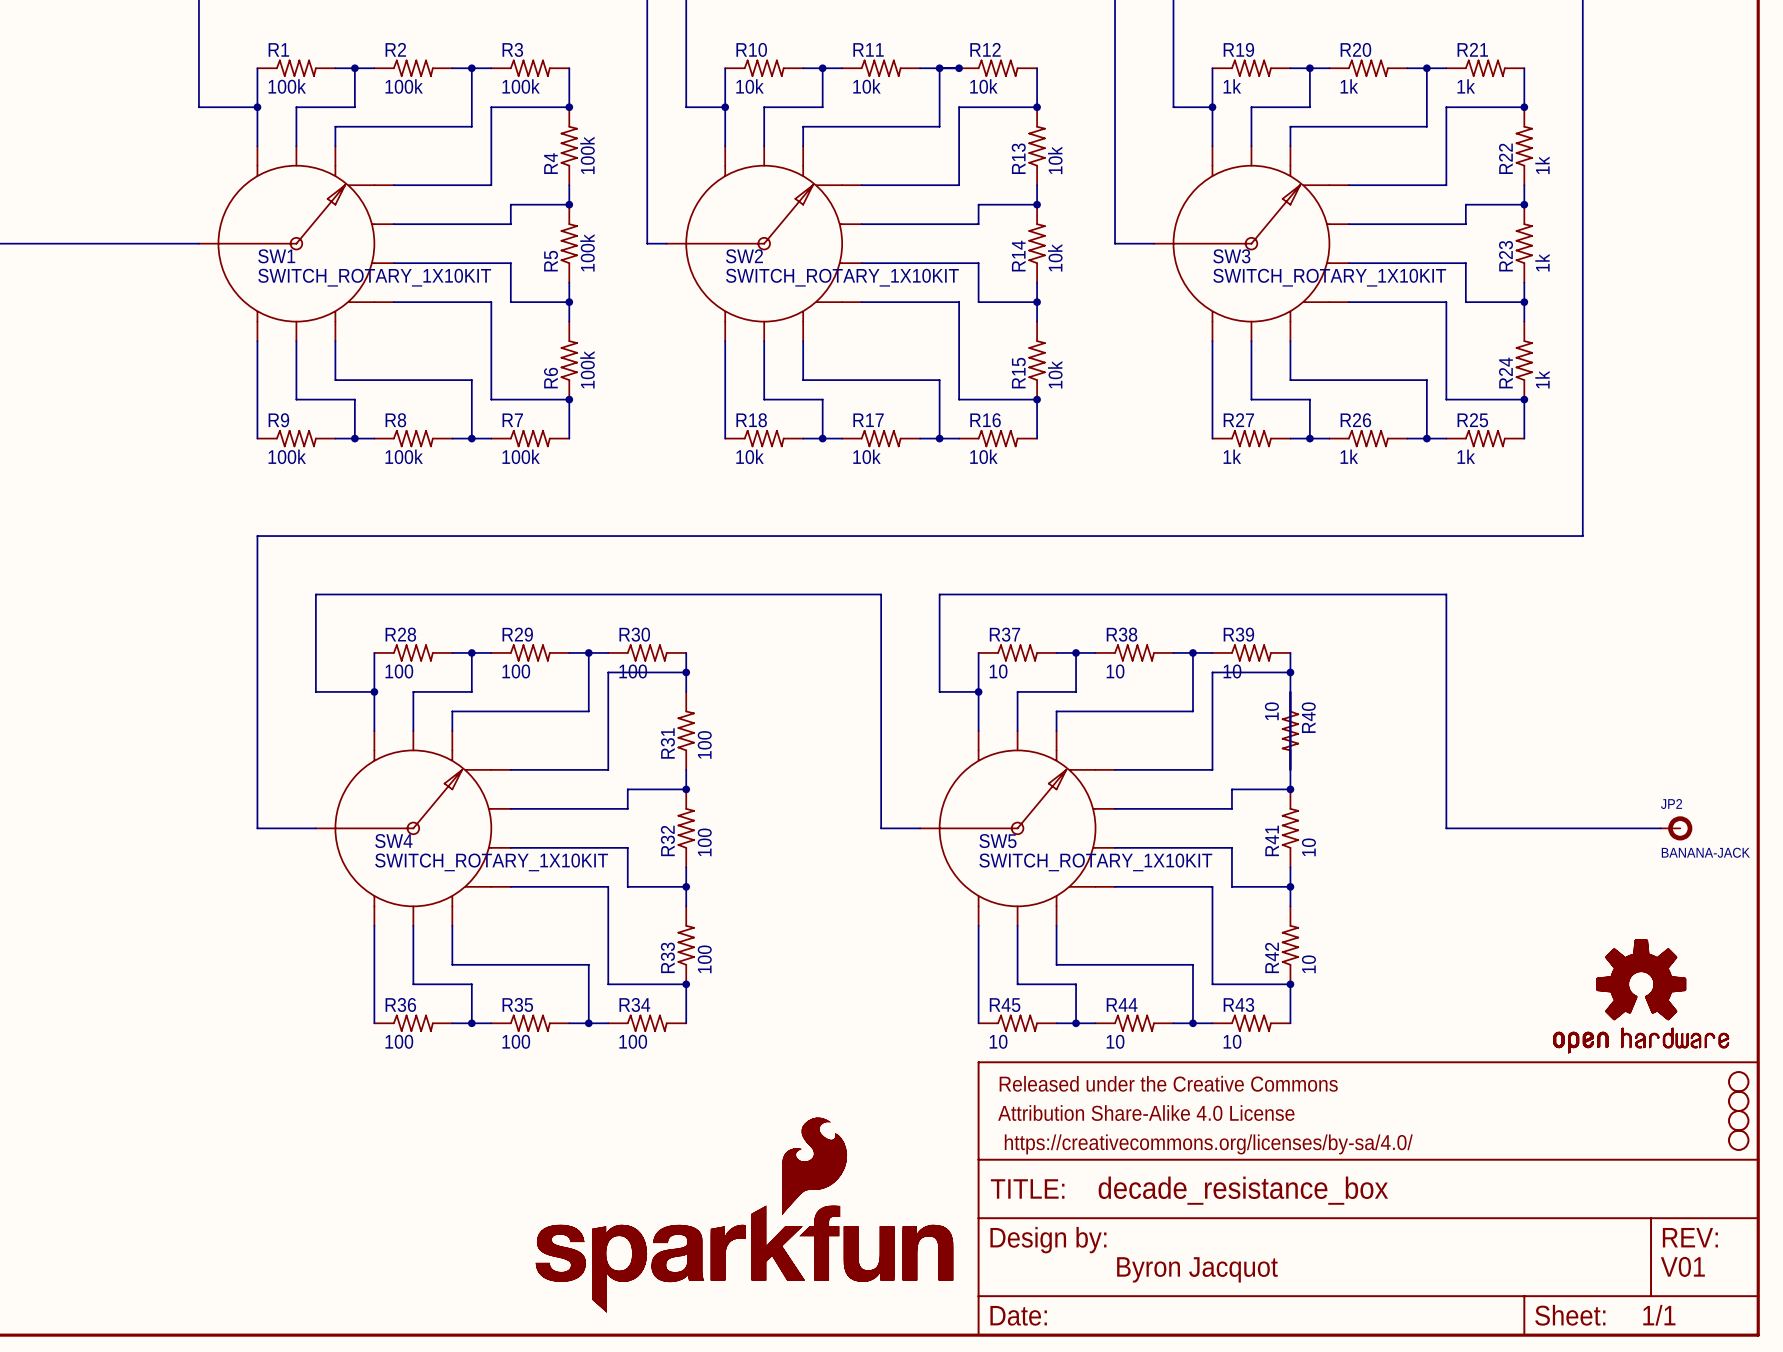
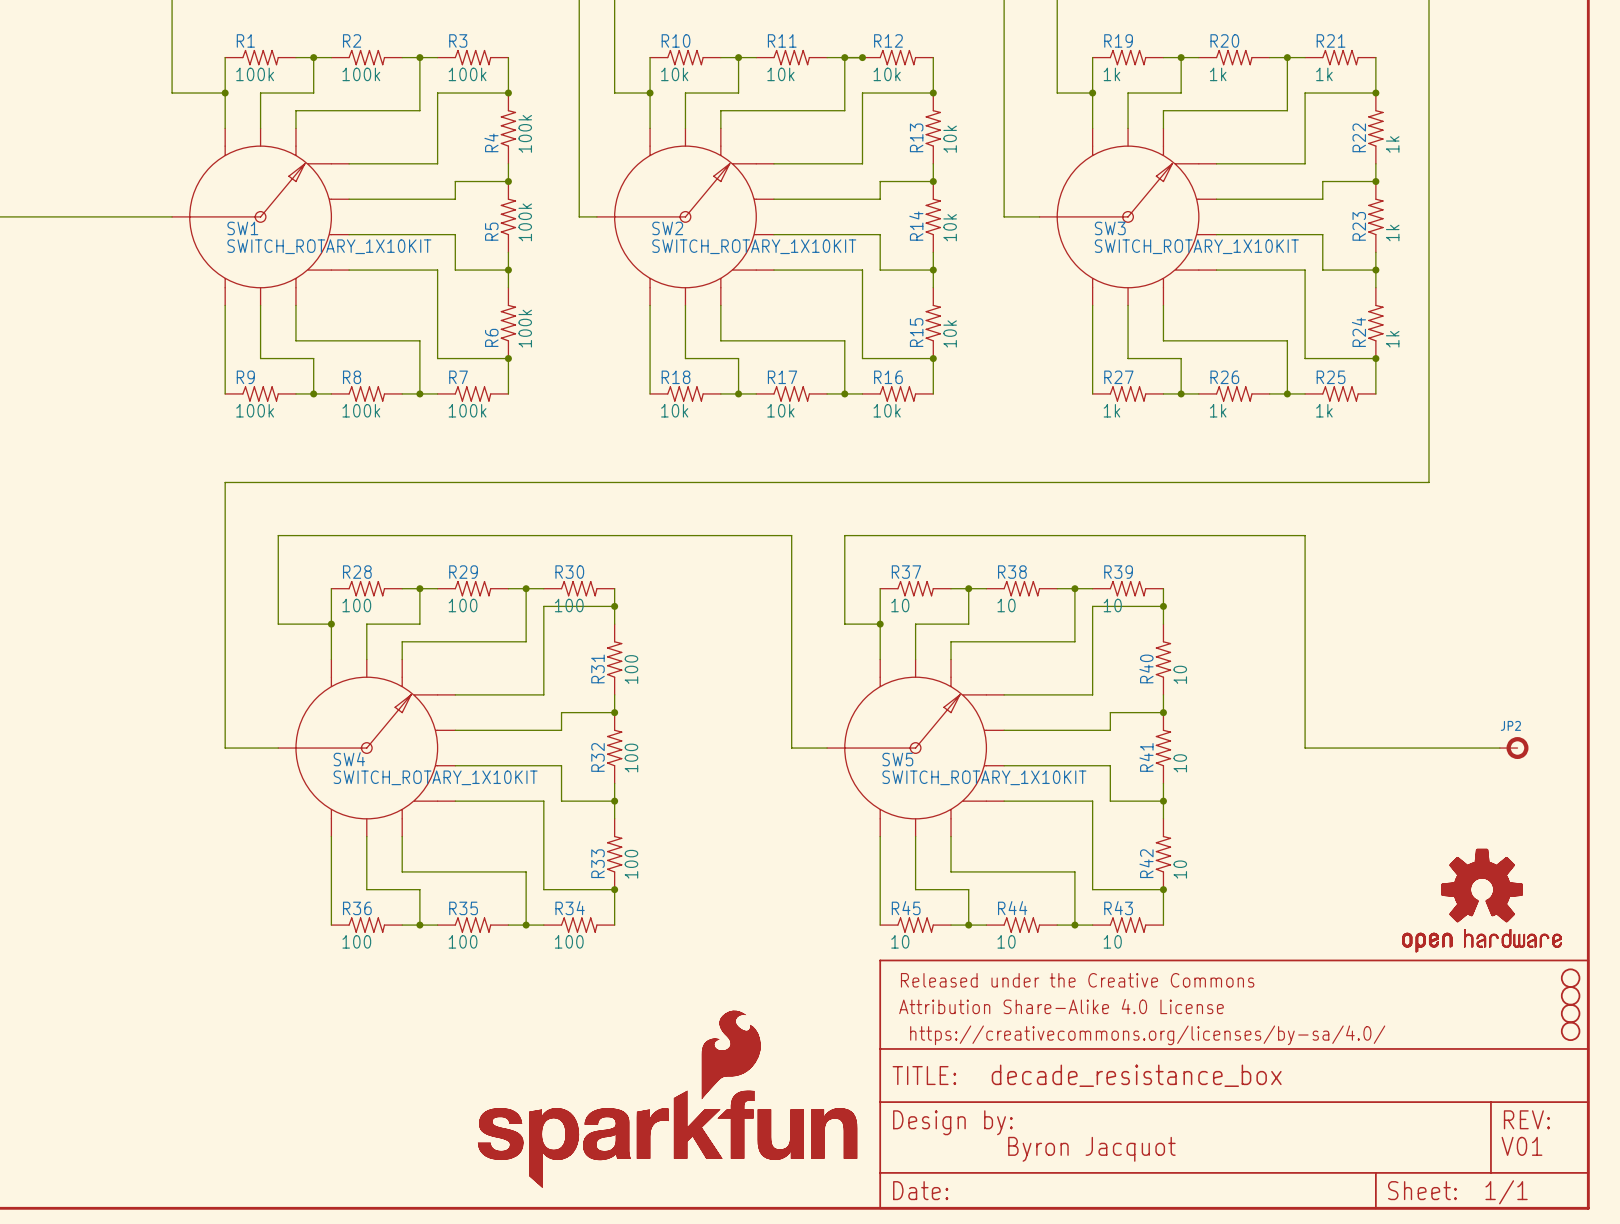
R40 rotation: 0° (1290, 730) -> 180° (1163, 659)
JP2 value: BANANA-JACK (1705, 852) -> none

